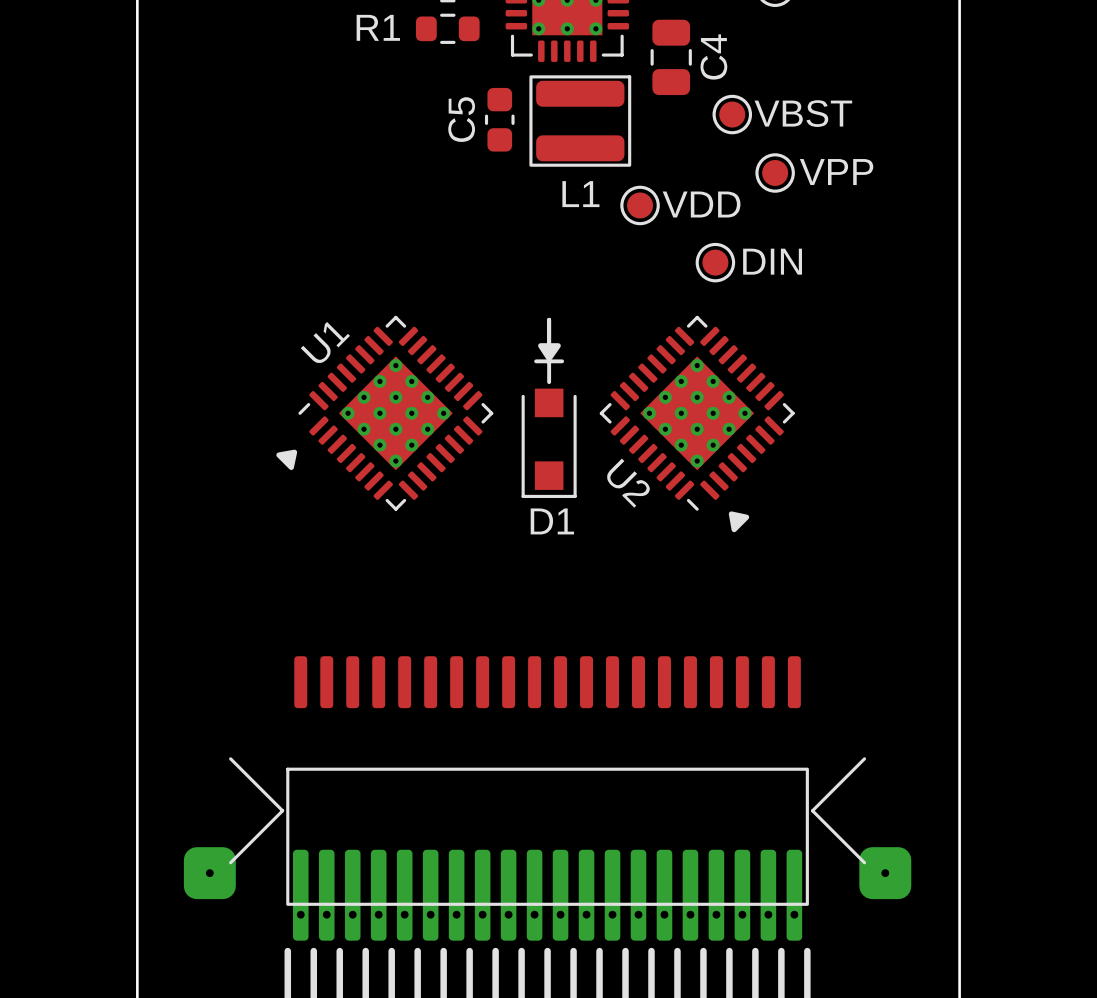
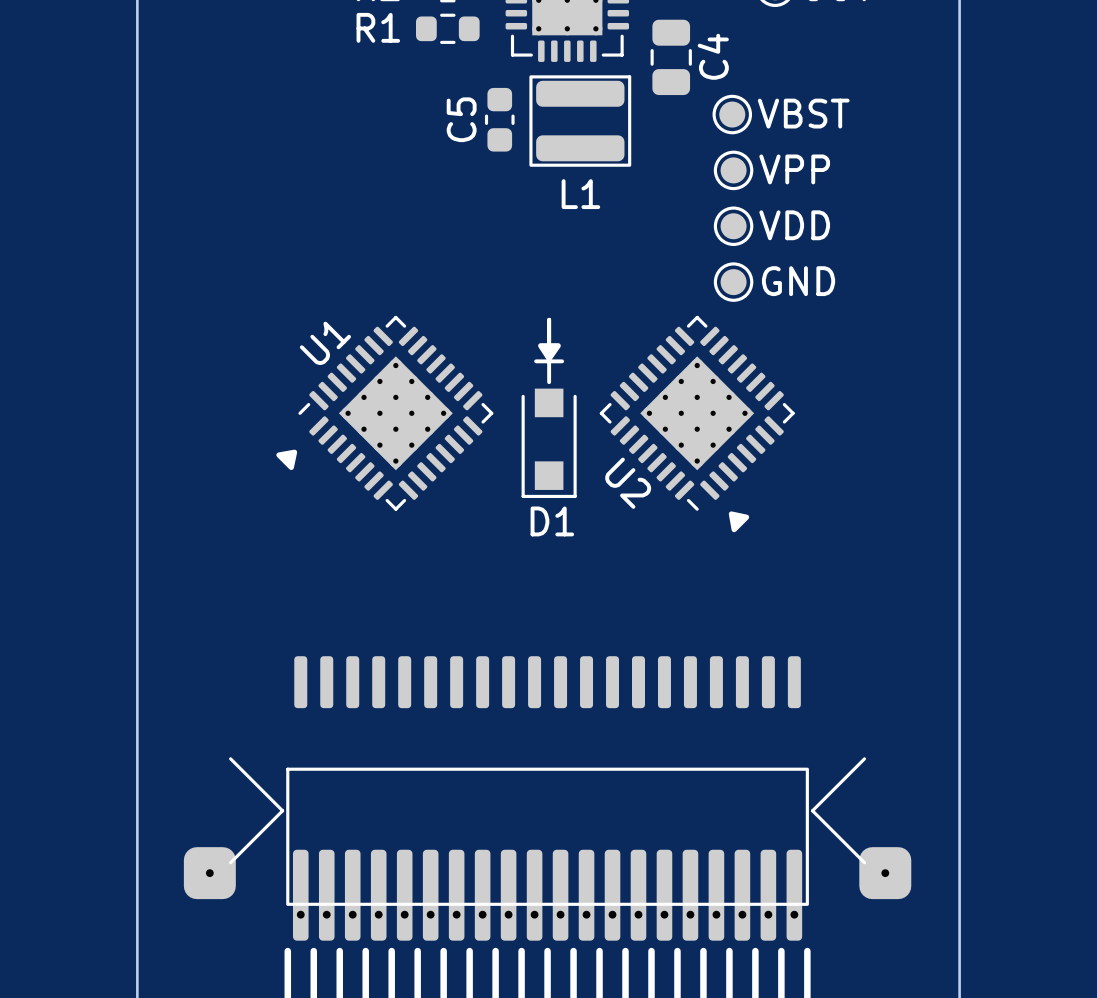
part position: (775, 173) -> (733, 170)
part position: (640, 205) -> (733, 226)
part: (715, 262) -> none
part: none -> (733, 282)

